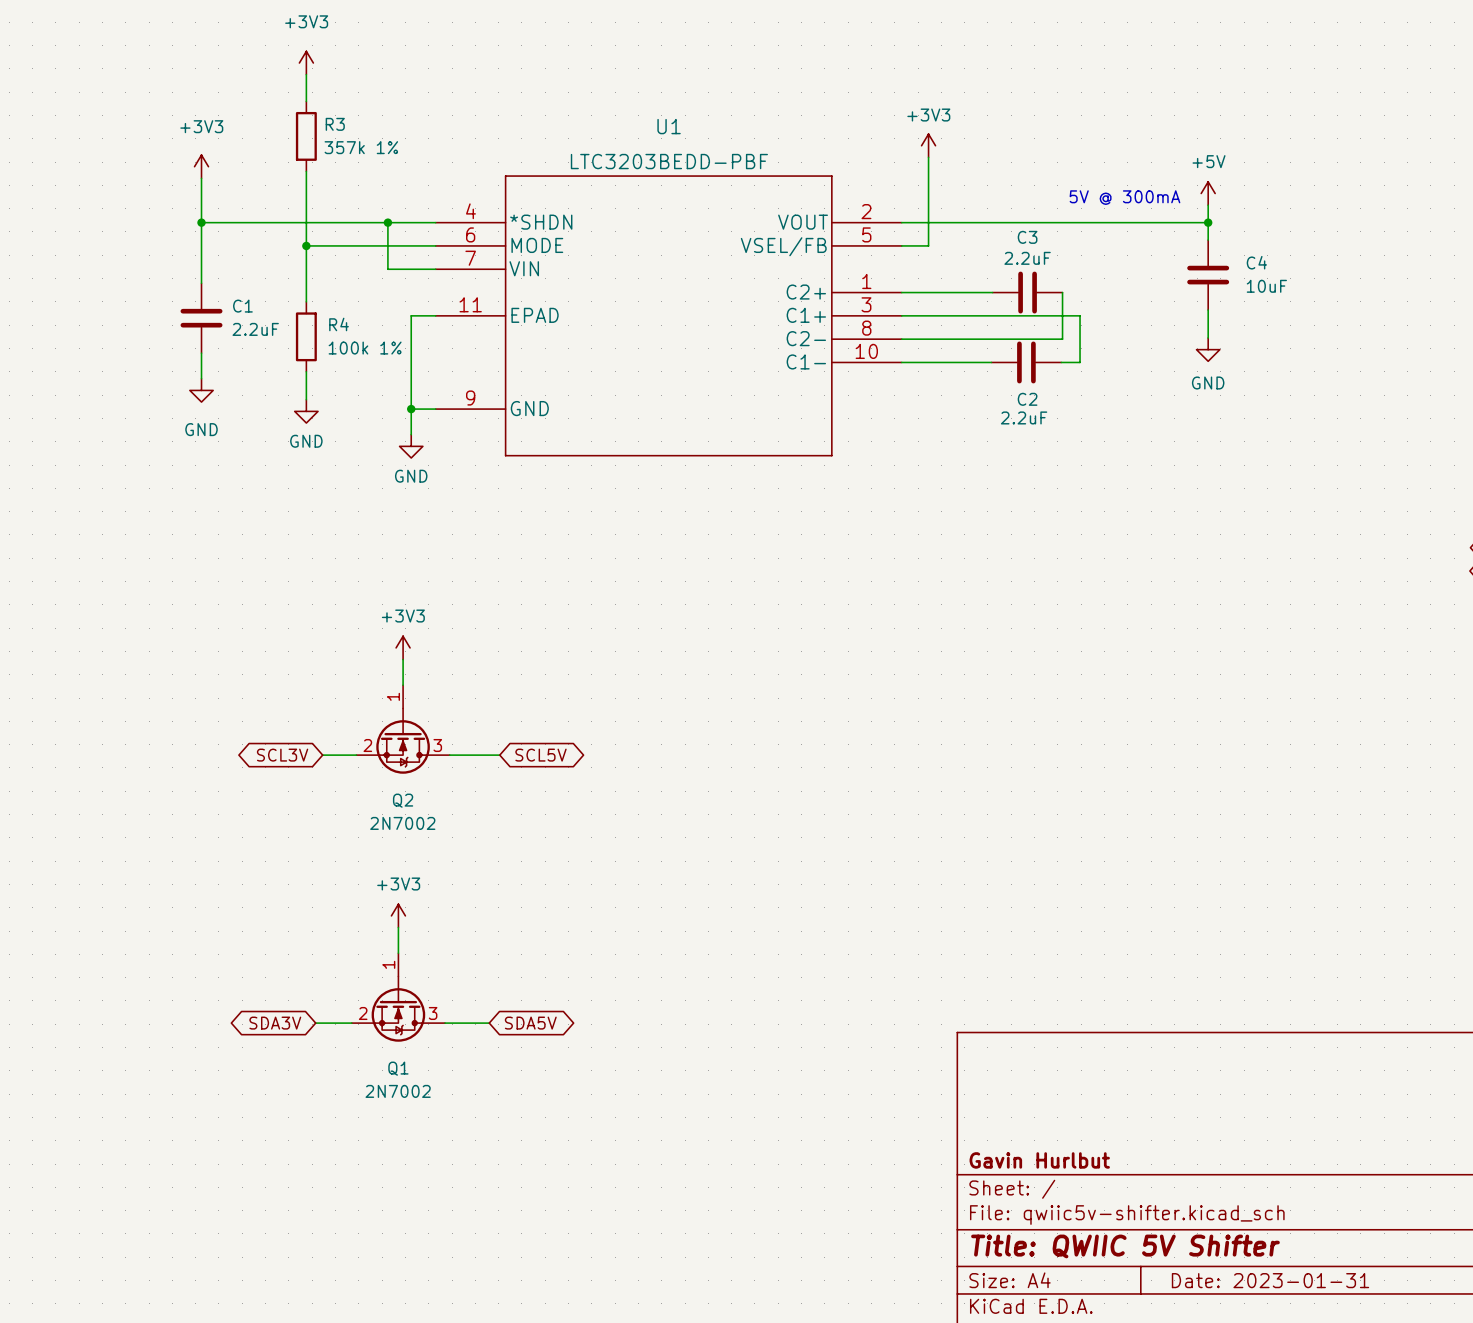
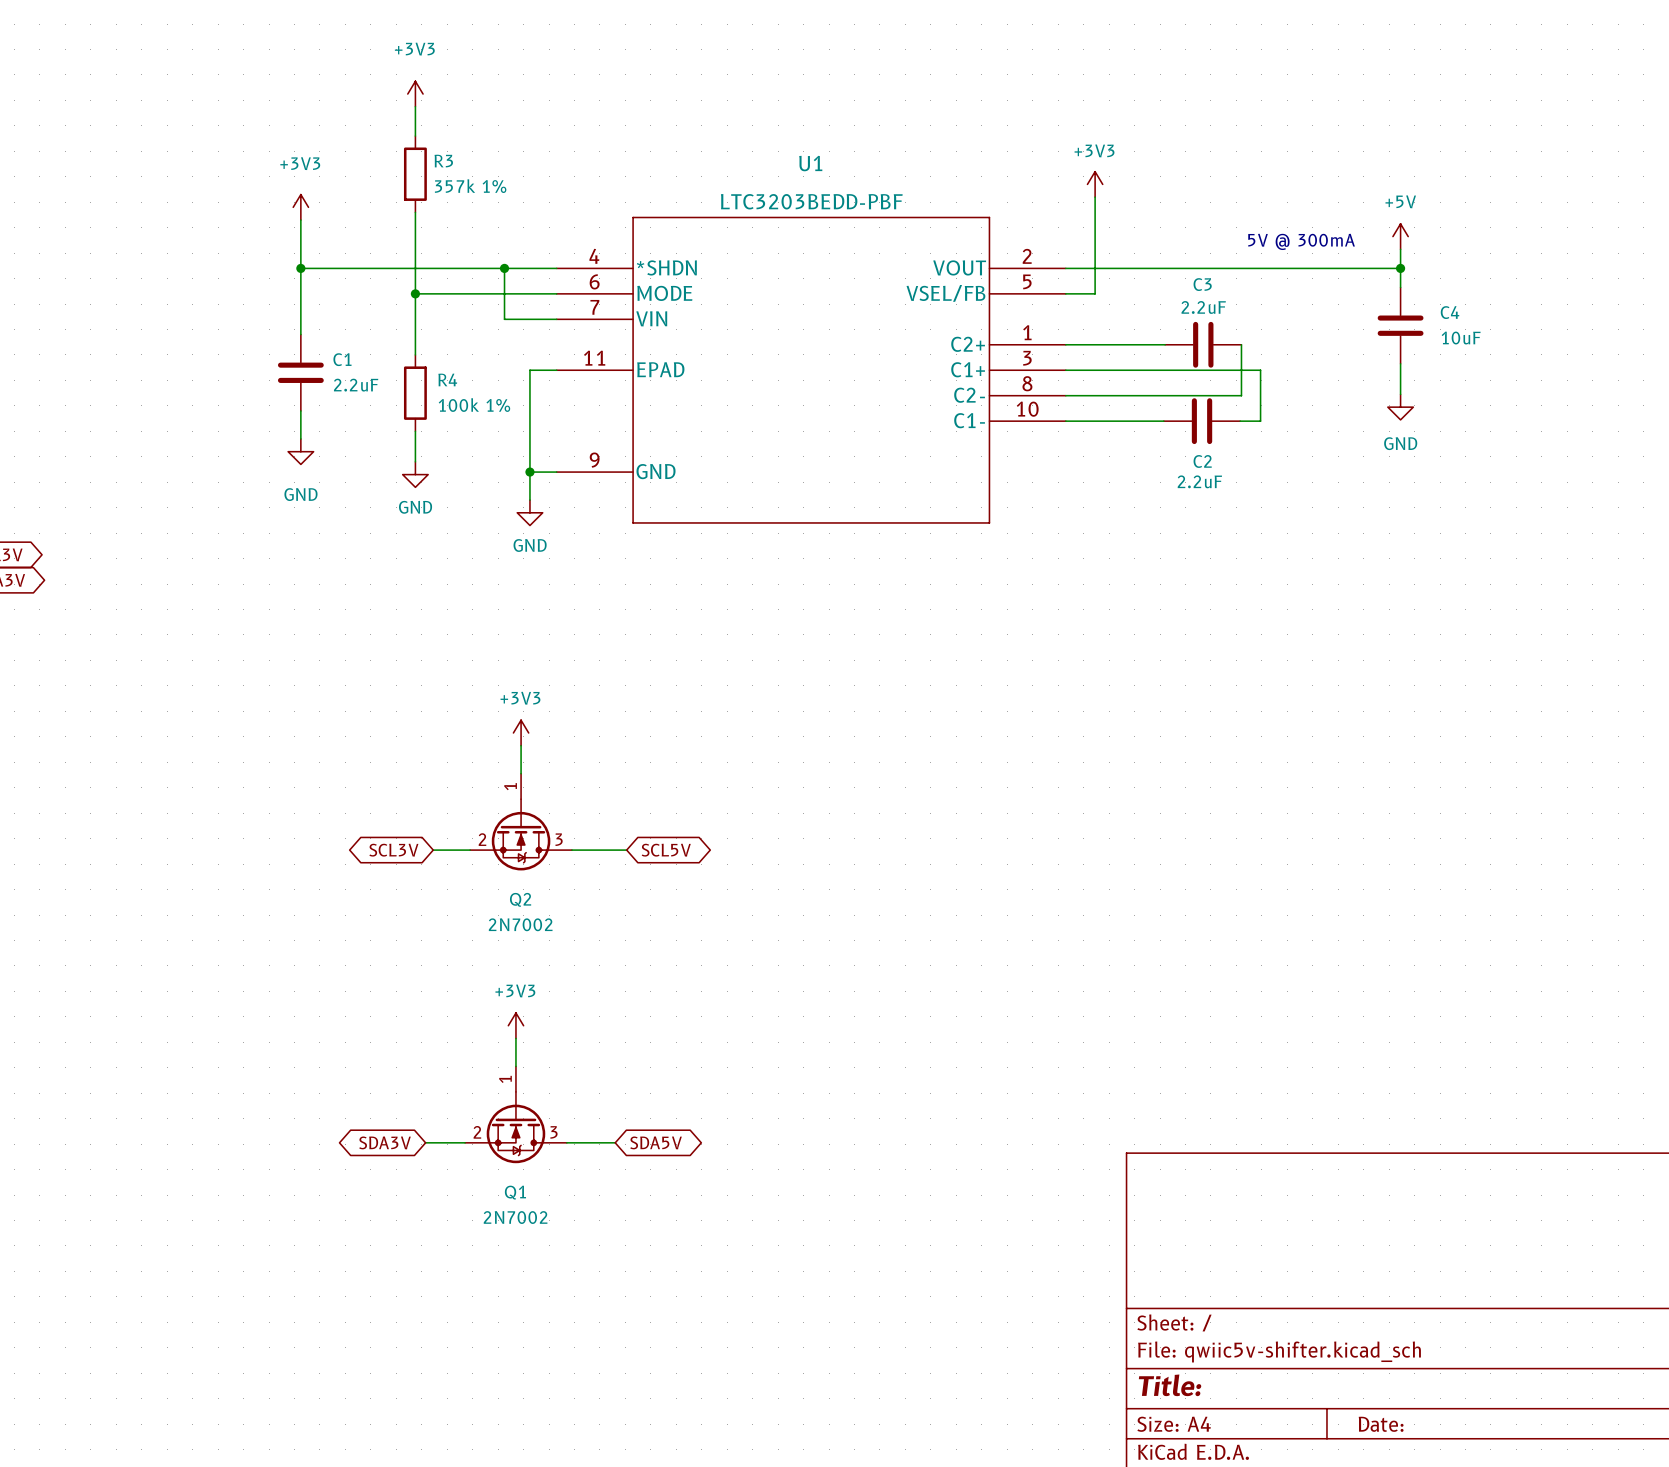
title block: Gavin Hurlbut (1039, 1160) -> none
title block: Title: QWIIC 5V Shifter (1125, 1246) -> Title: (1170, 1385)
title block: Date: 2023-01-31 (1270, 1280) -> Date: (1381, 1424)

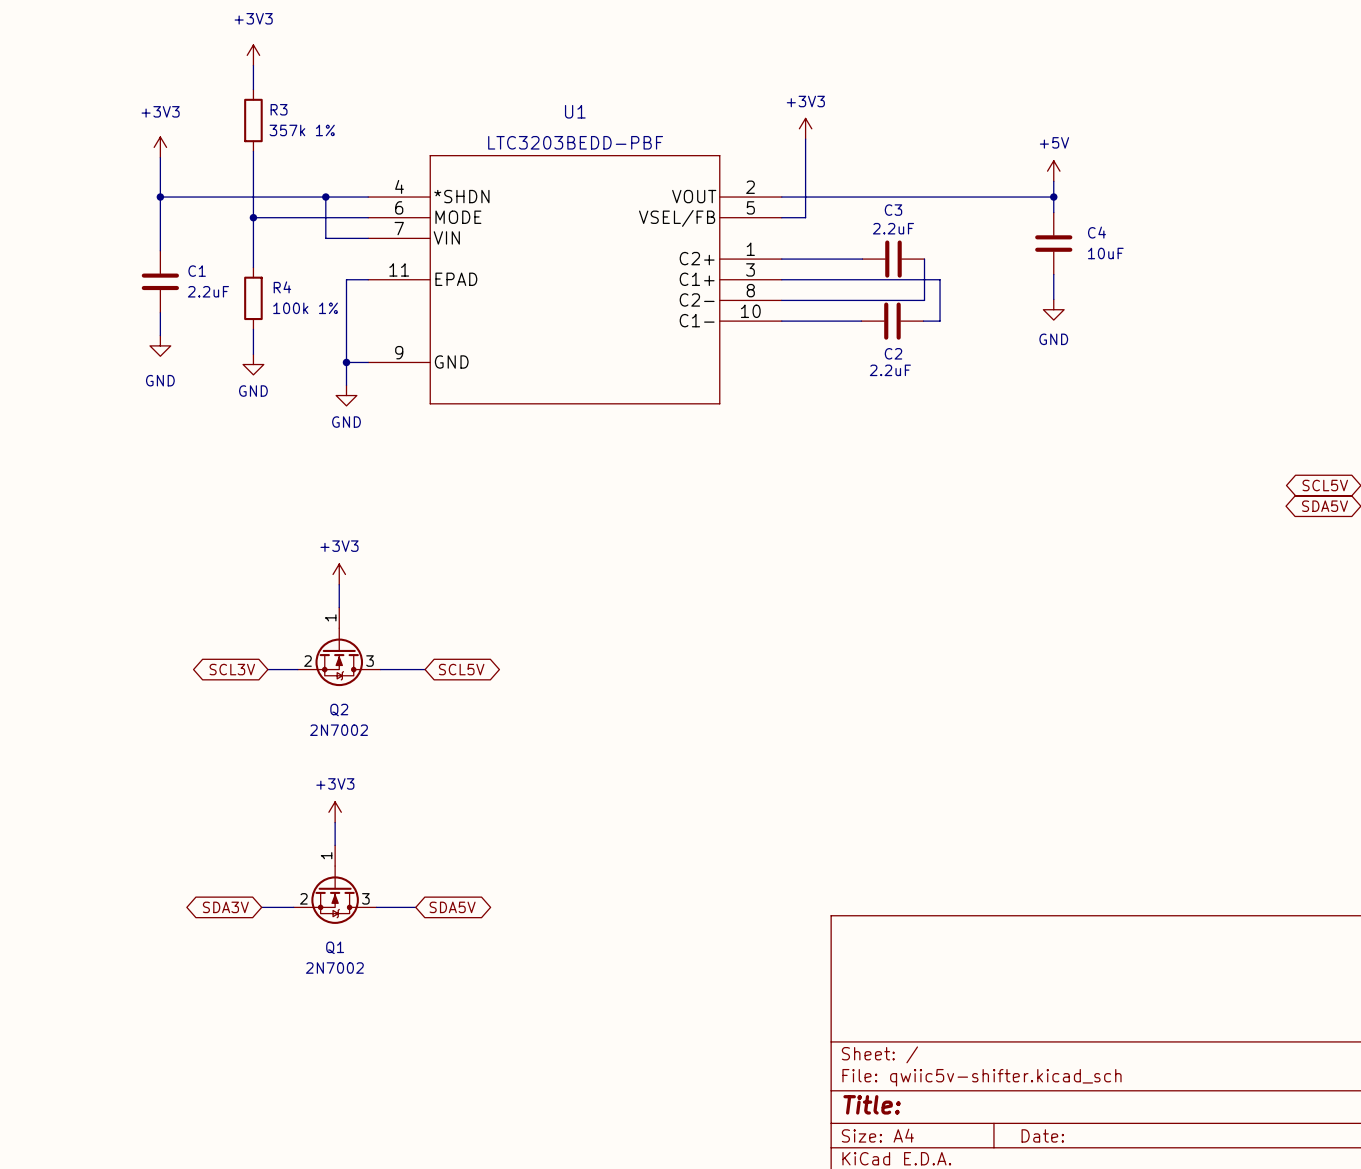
text: 5V @ 300mA (1301, 241) -> none

